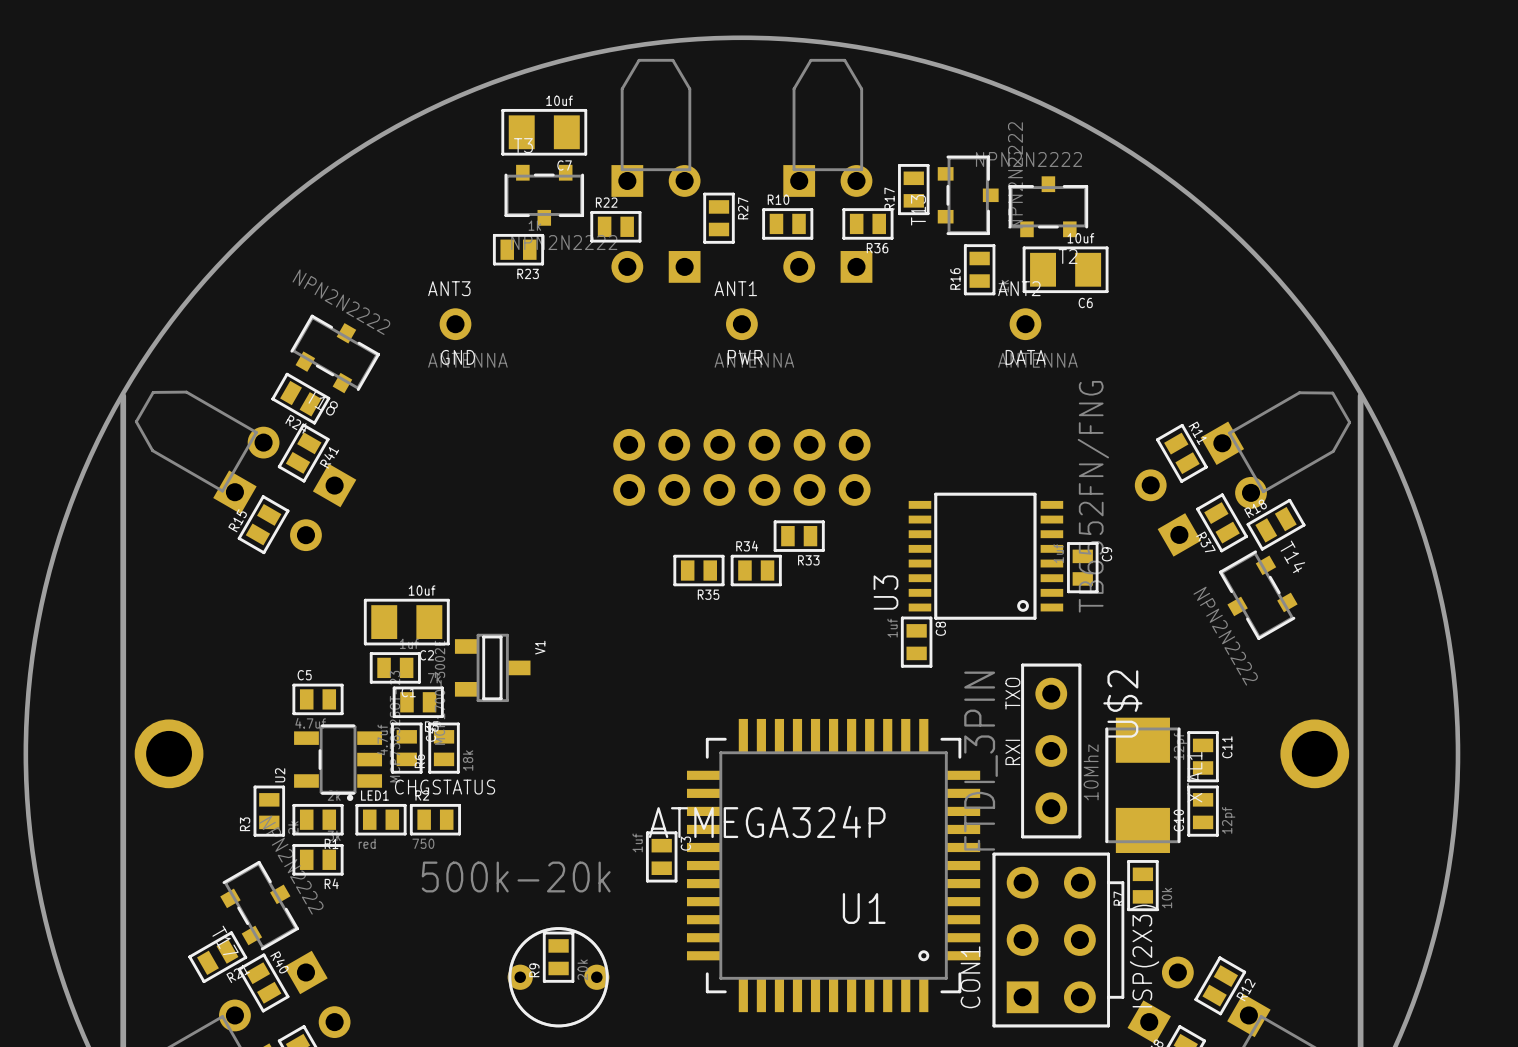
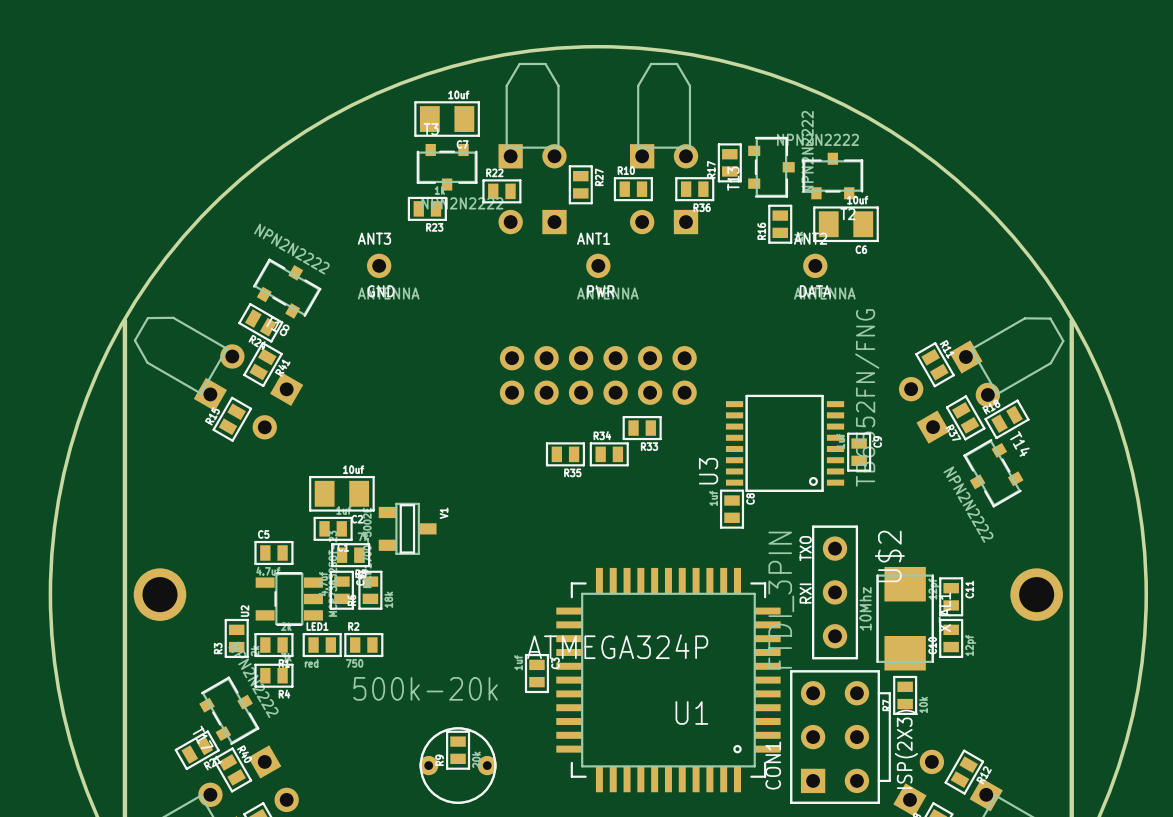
text: CHGSTATUS (445, 787) -> none
LED1 footprint: [346, 794, 407, 836] -> [302, 632, 342, 658]

